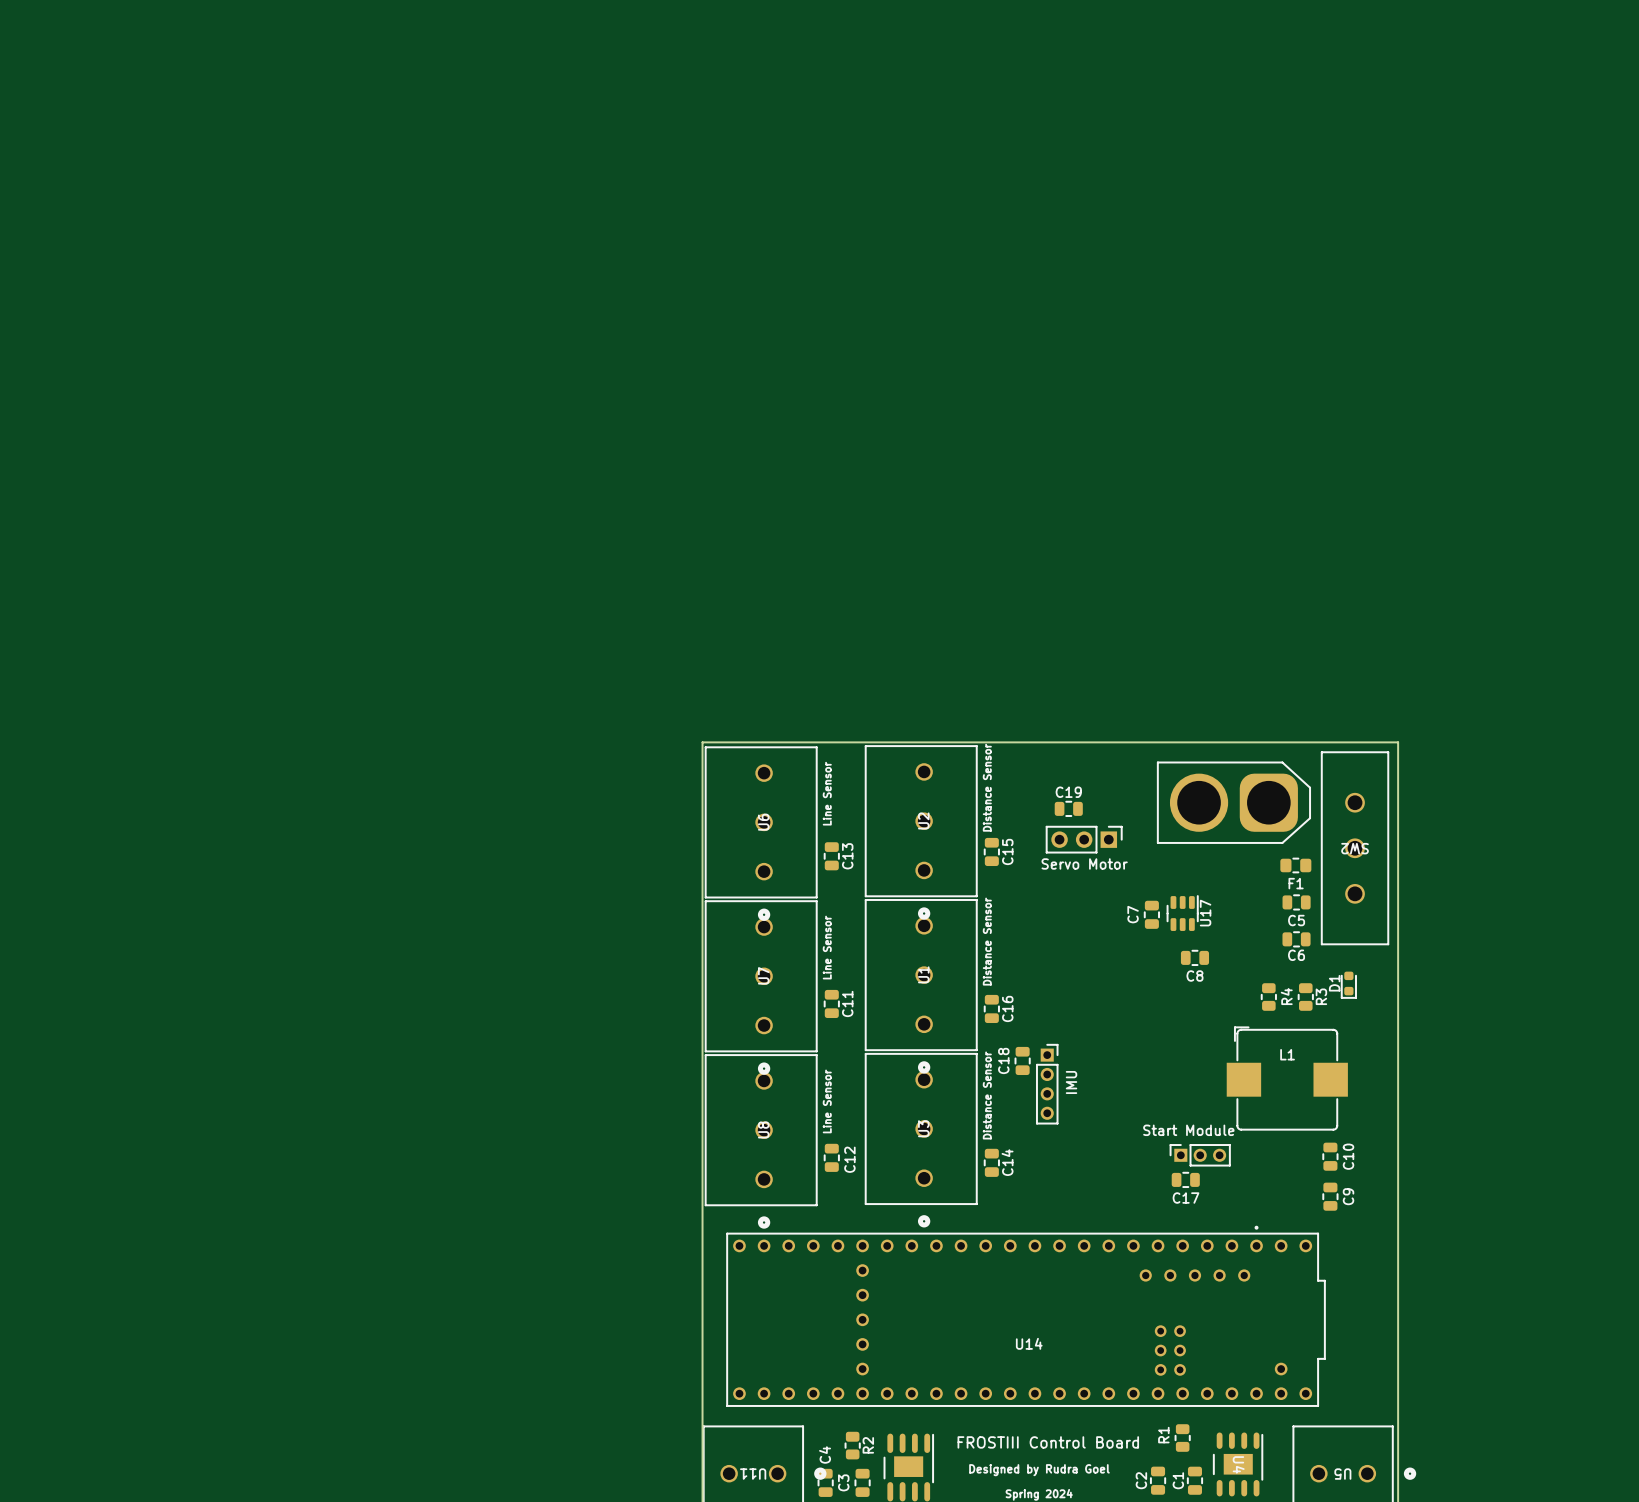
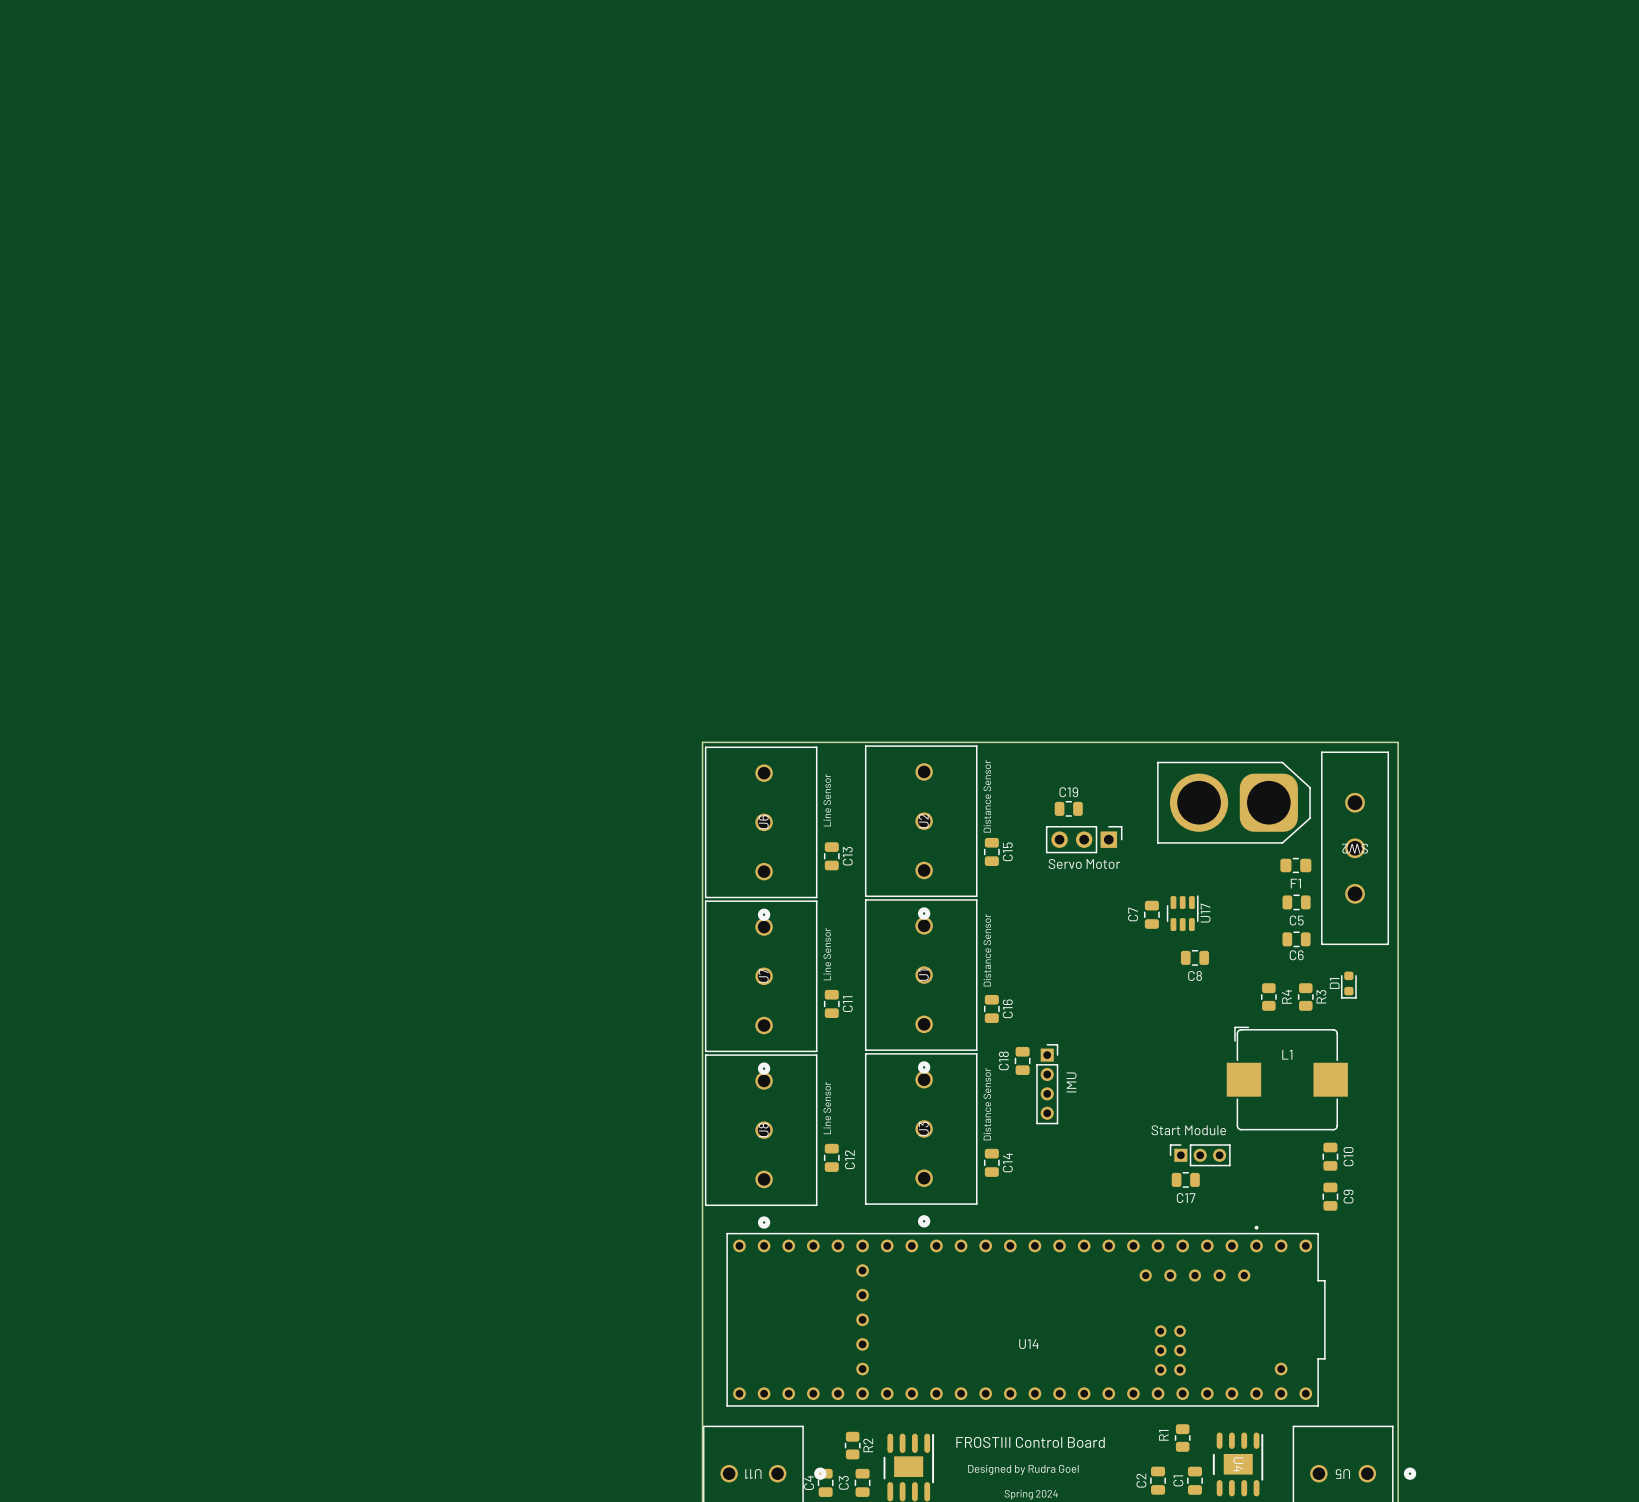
C4 name position: C4 (825, 1454) -> C4 (809, 1482)

